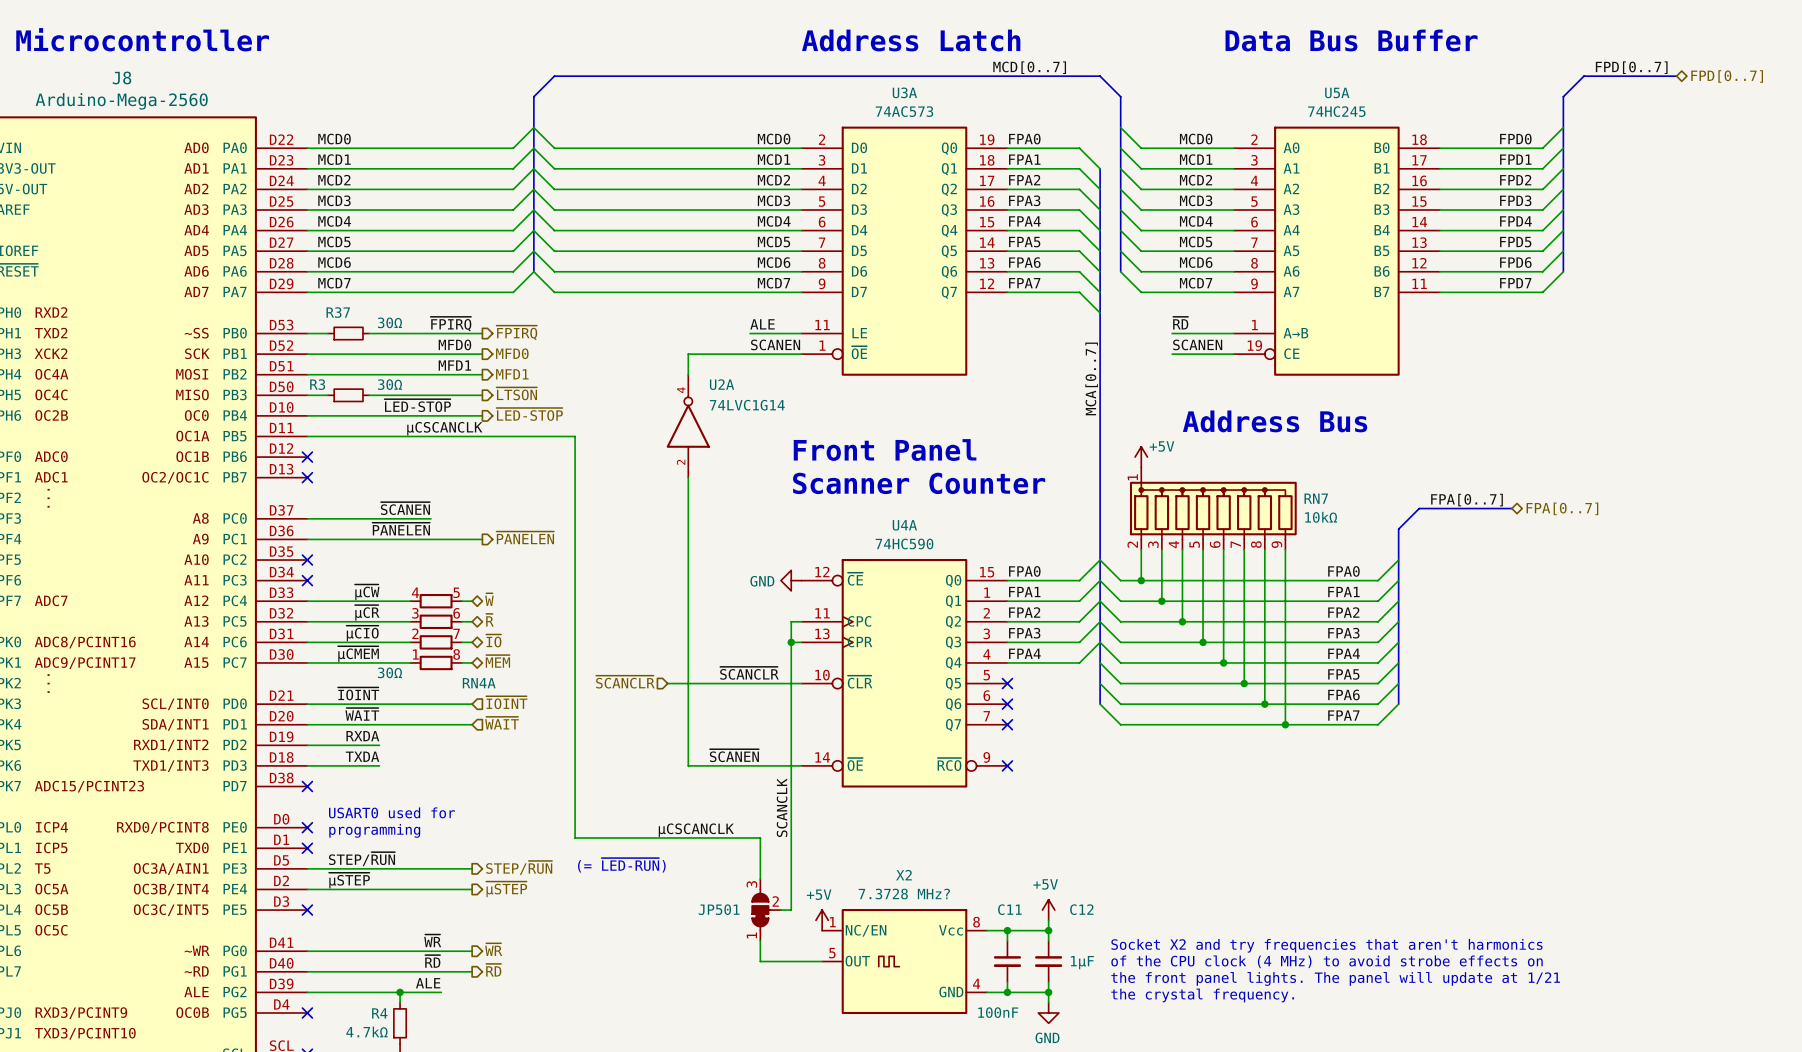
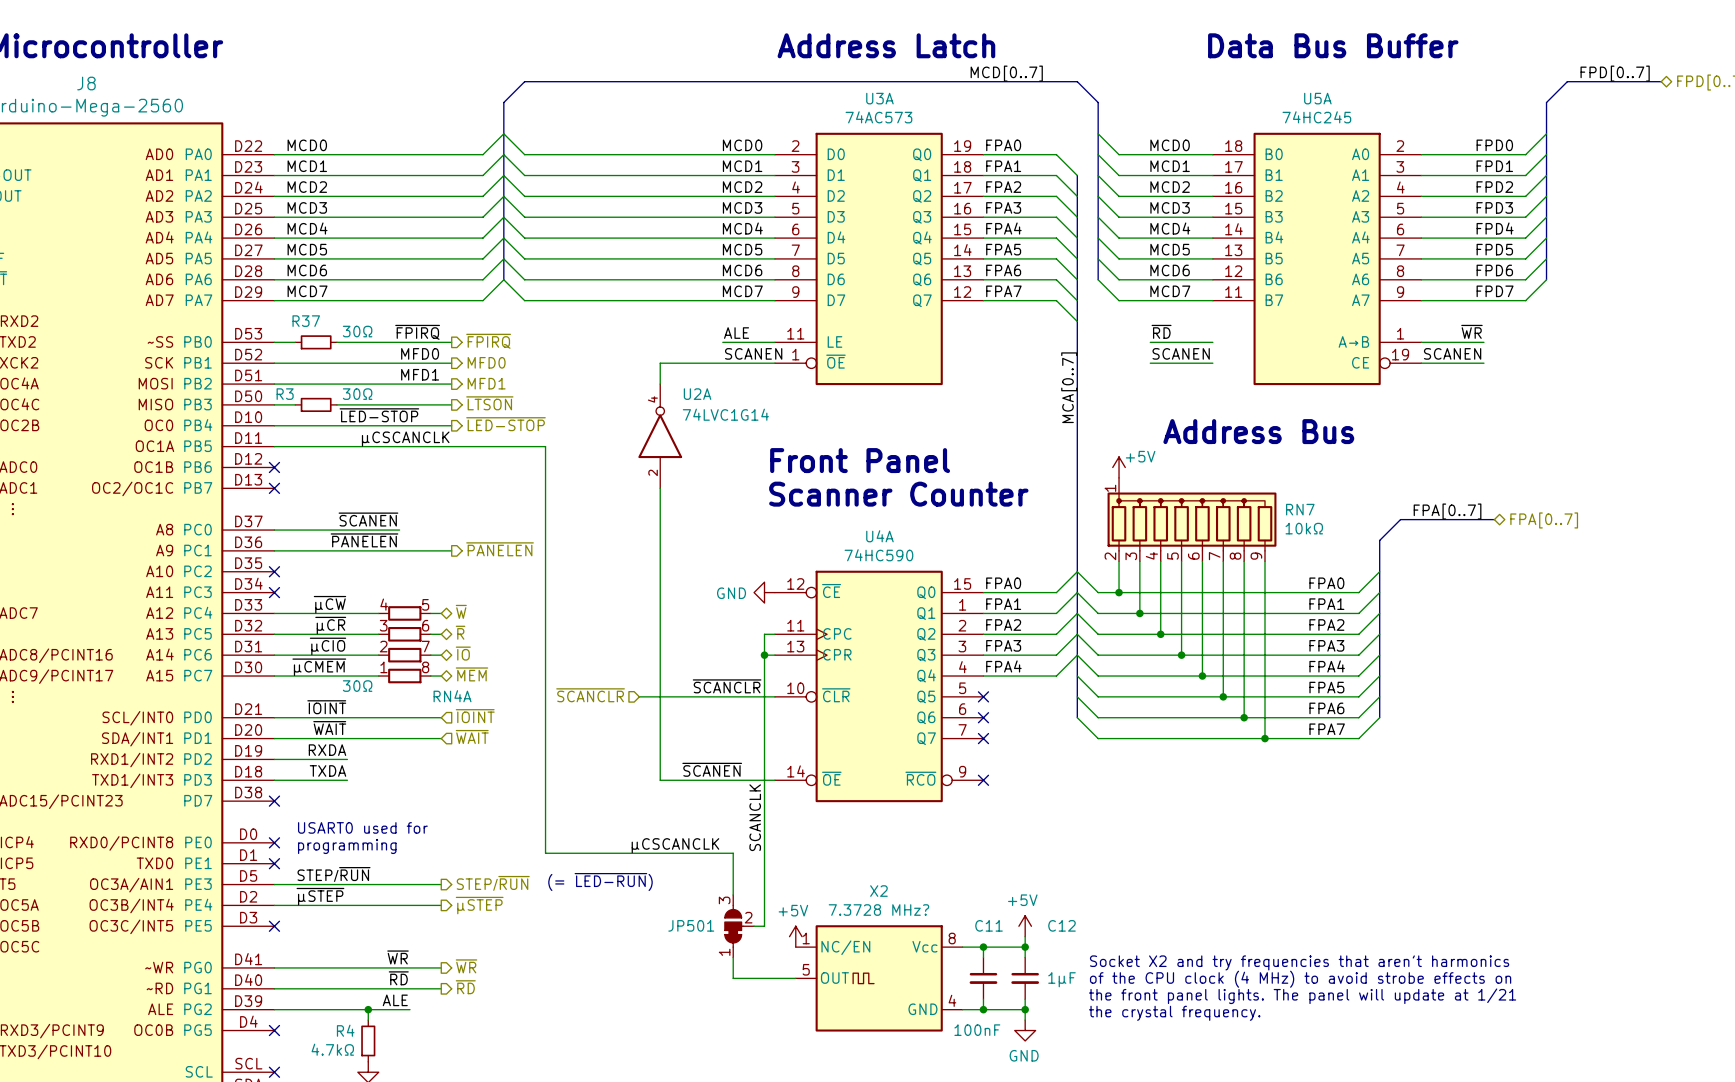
U5A flip: as is (1336, 251) -> left-right (1317, 258)
label: none -> ~{WR} (1471, 331)
wire: none -> (1421, 342) (1483, 342)
label: none -> SCANEN (1452, 353)
wire: none -> (1421, 363) (1483, 363)

